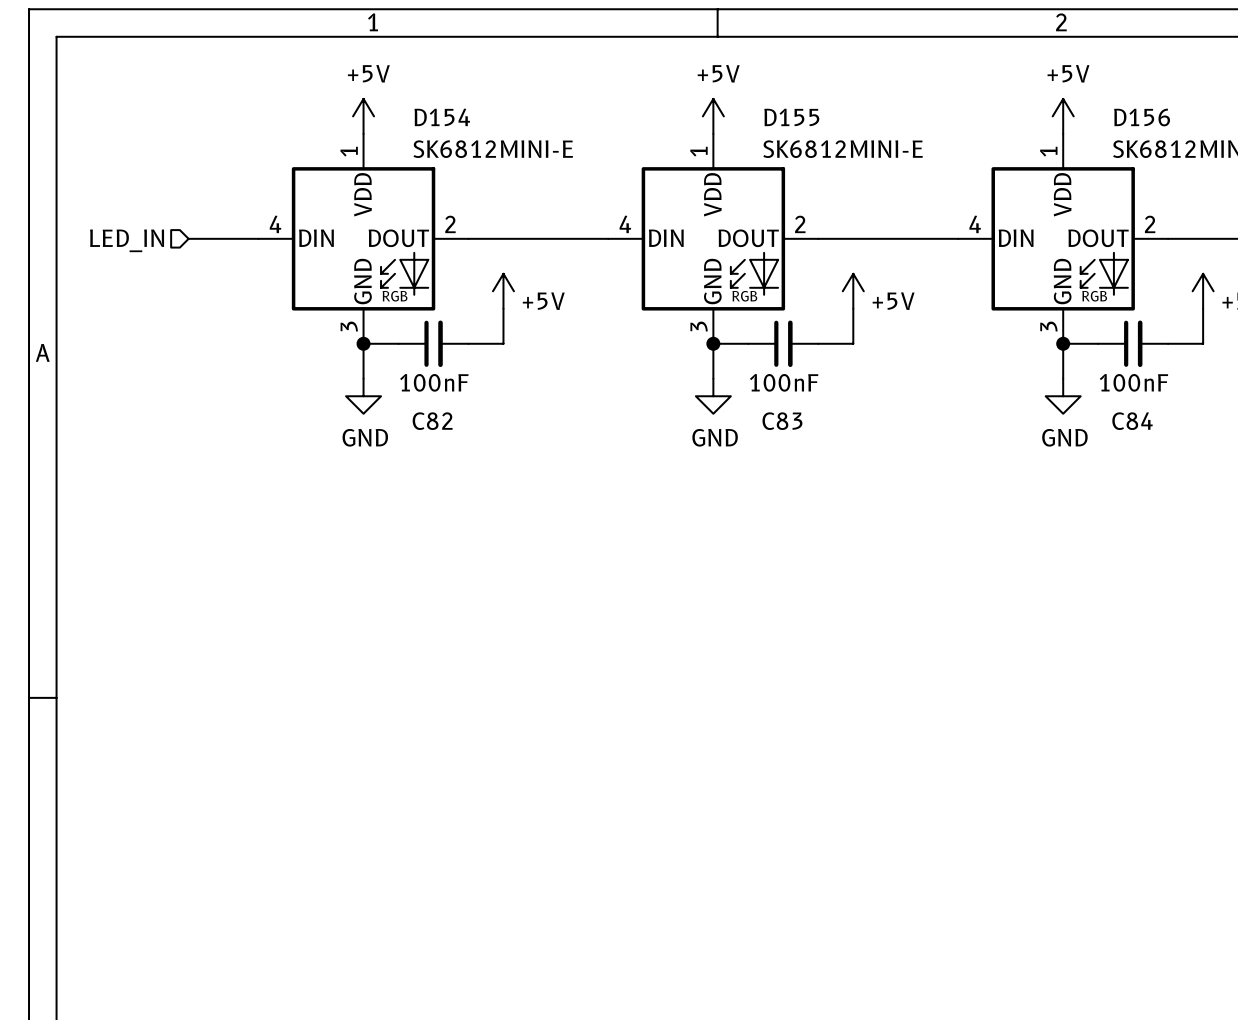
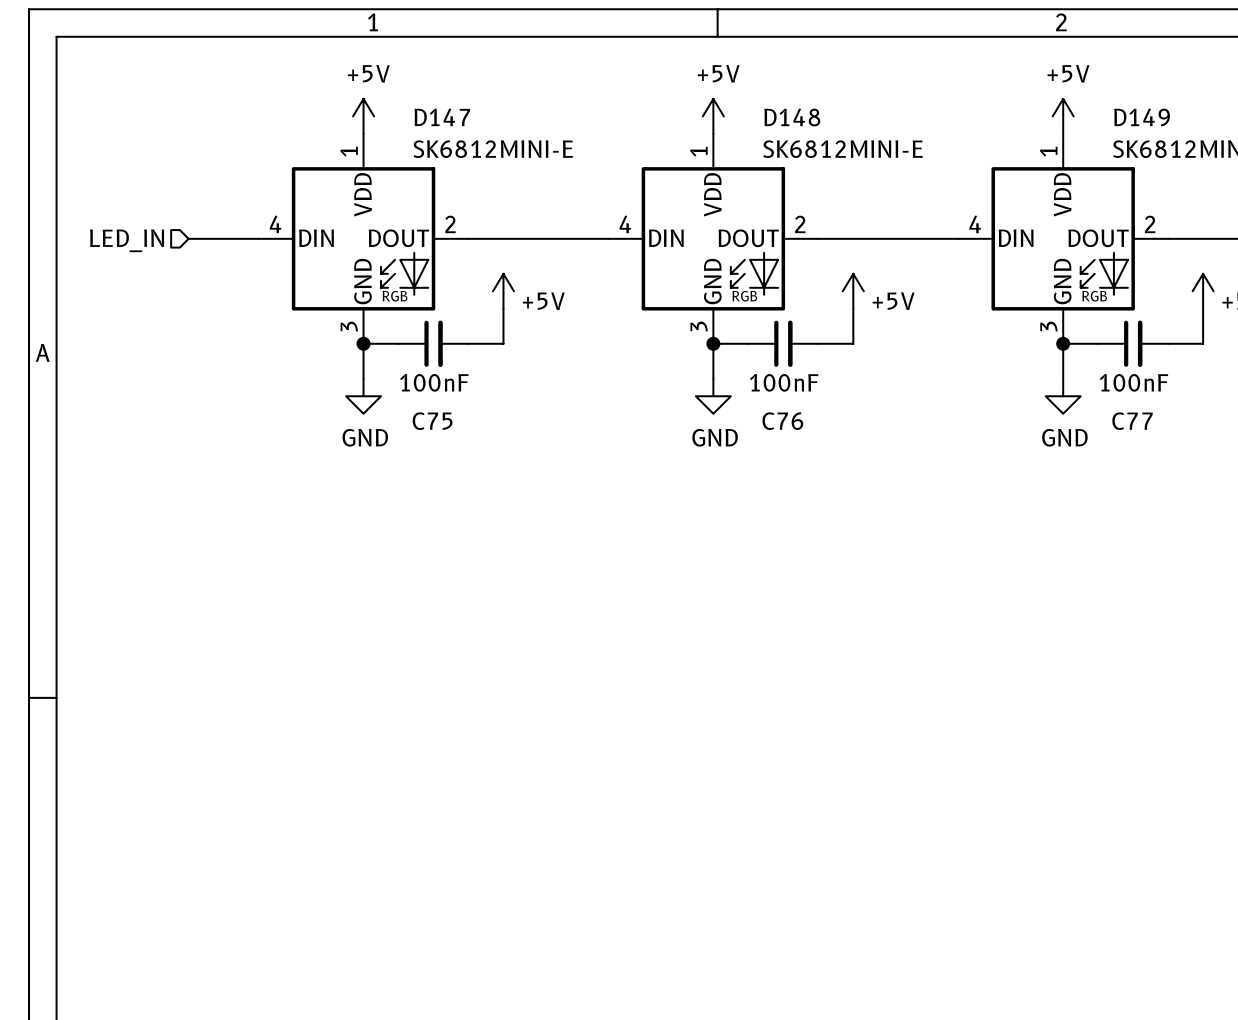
D154 name: D154 (442, 117) -> D147 (442, 117)
D155 name: D155 (791, 117) -> D148 (792, 117)
D156 name: D156 (1142, 117) -> D149 (1142, 117)
C82 name: C82 (432, 421) -> C75 (432, 421)
C83 name: C83 (782, 421) -> C76 (782, 421)
C84 name: C84 (1132, 421) -> C77 (1132, 421)

